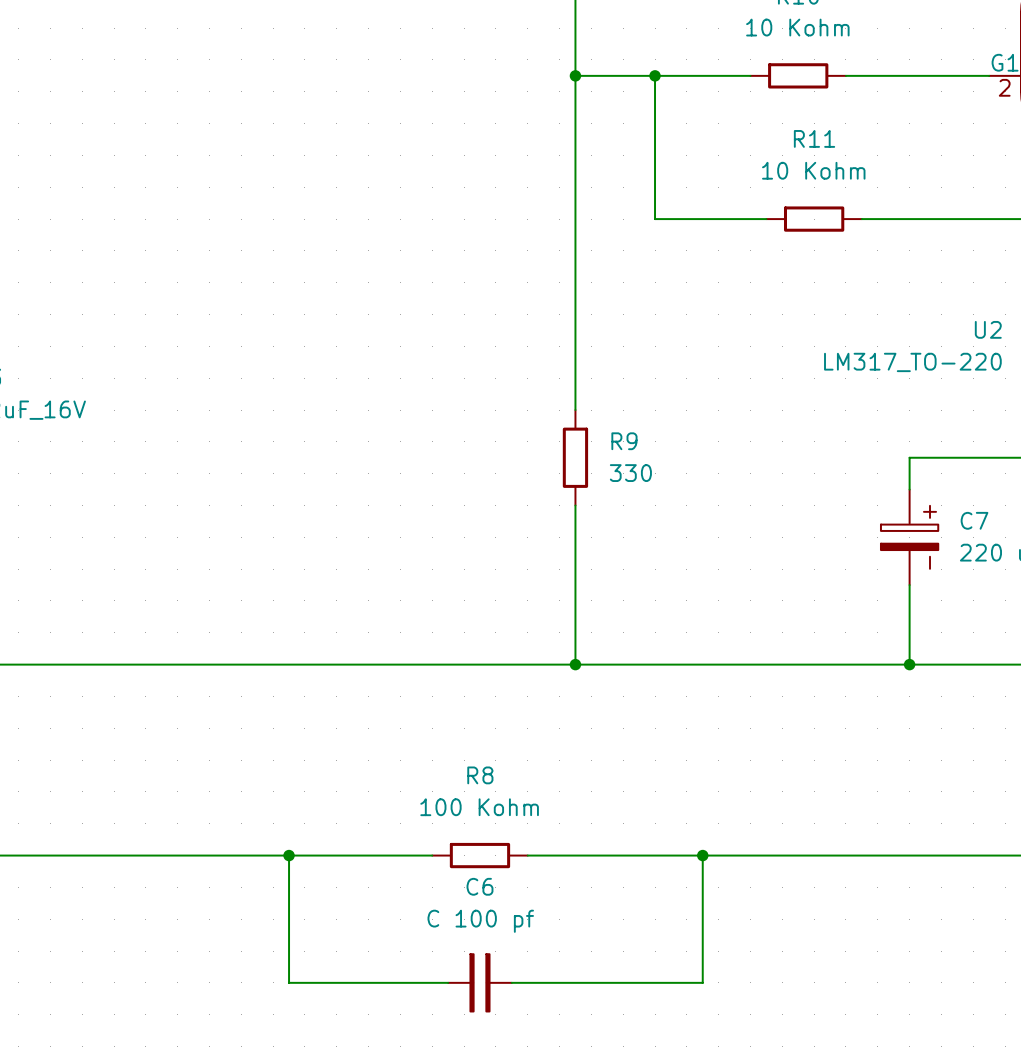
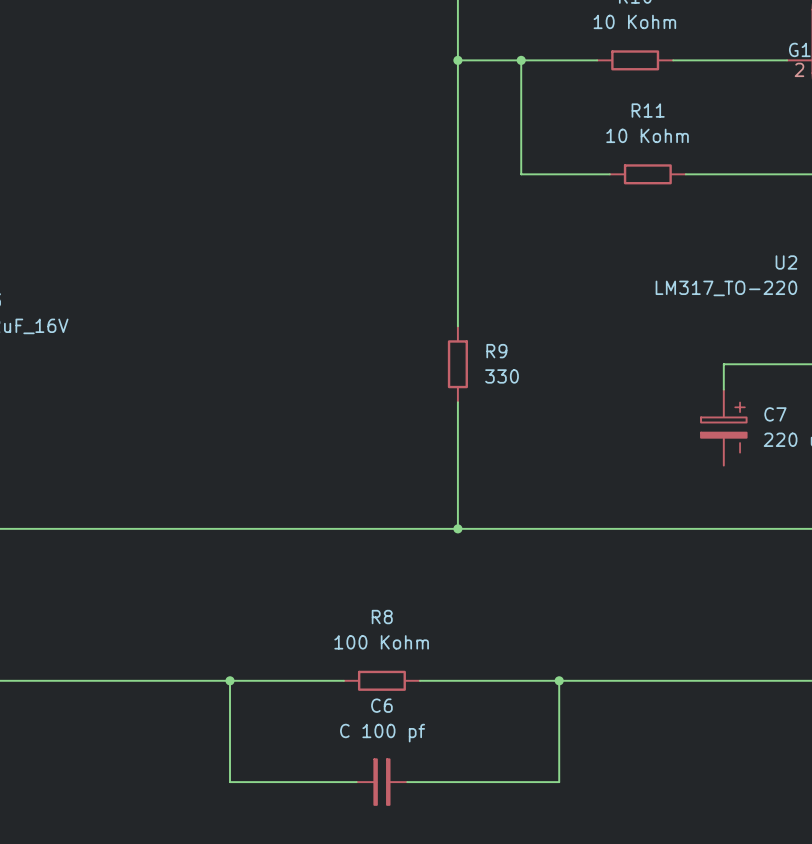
wire: (909, 585) (909, 664) -> none
junction: (909, 664) -> none

